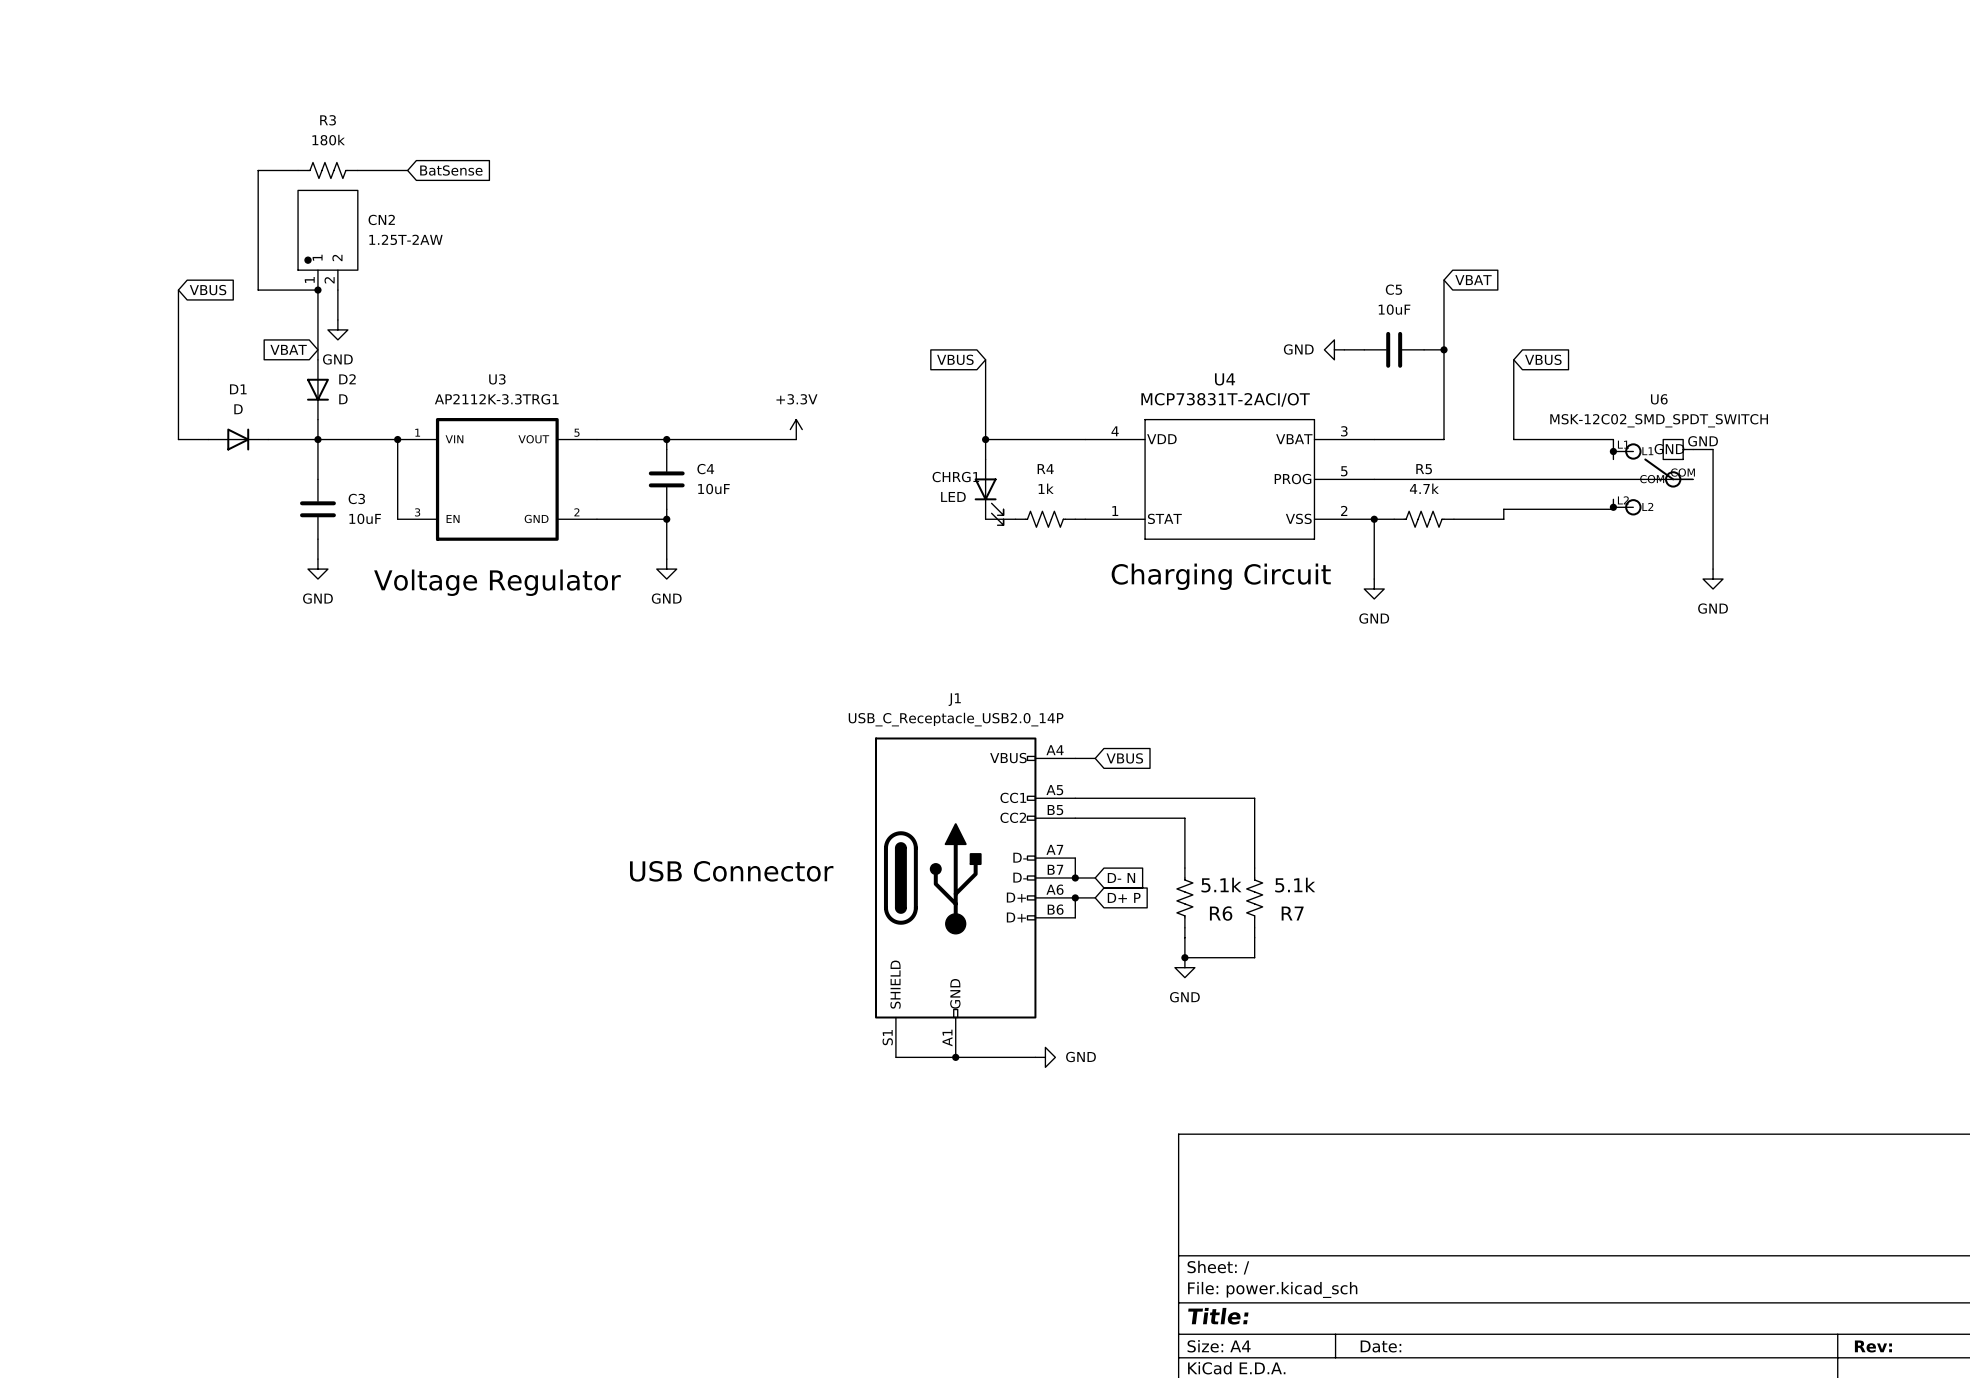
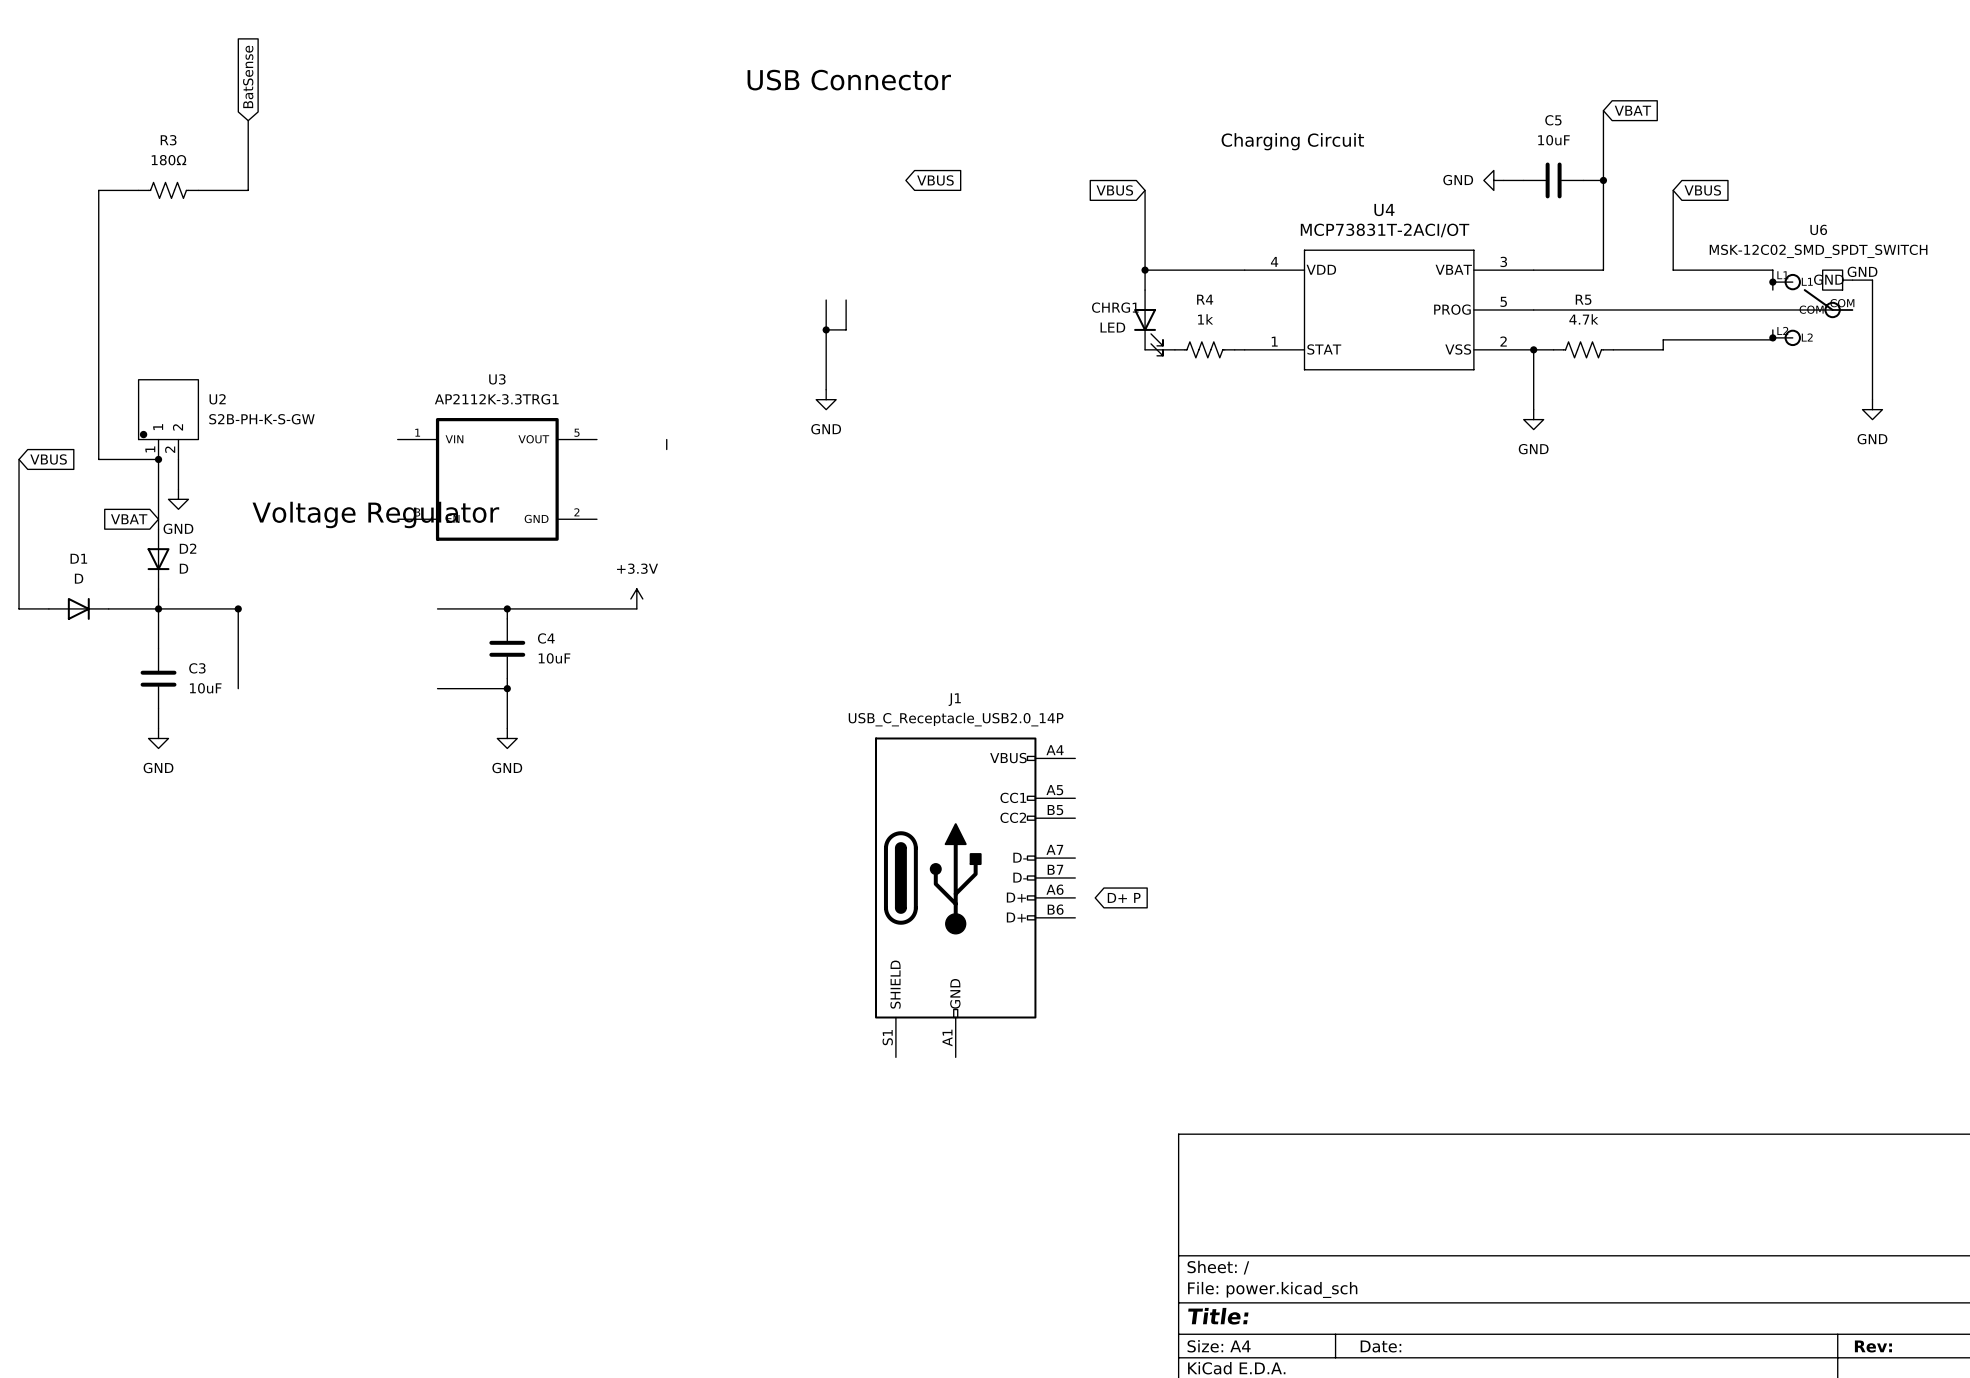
text: none -> USB Connector (849, 80)
wire: none -> (1603, 110) (1603, 270) (1533, 270)
global label: none -> VBAT (1632, 110)
wire: none -> (248, 120) (248, 190) (198, 190)
R3 value: 180k (328, 140) -> 180Ω (168, 160)
text: none -> Charging Circuit (1292, 141)
wire: (298, 170) (258, 170) (258, 290) (317, 290) (317, 359) -> none
R3 position: (327, 170) -> (168, 190)
wire: (357, 170) (407, 170) -> none
global label rotation: 0° (451, 170) -> 90° counterclockwise (248, 76)
global label position: BatSense (451, 170) -> BatSense (248, 76)
global label: none -> VBUS (935, 180)
power symbol: none -> GND (1493, 180)
wire: none -> (1583, 180) (1603, 180)
junction: none -> (1603, 180)
wire: none -> (138, 190) (98, 190) (98, 459) (158, 459) (158, 529)
global label: none -> VBUS (1114, 190)
wire: none -> (1145, 190) (1145, 290)
wire: none -> (1673, 190) (1673, 270) (1772, 270) (1772, 290)
global label: none -> VBUS (1702, 190)
CN2: 1.25T-2AW (327, 239) -> none
wire: none -> (1145, 270) (1244, 270)
junction: none -> (1145, 270)
wire: (1444, 280) (1444, 439) (1374, 439) -> none
global label: VBAT (1473, 280) -> none
wire: none -> (1872, 280) (1872, 399)
junction: none -> (1772, 282)
wire: (178, 290) (178, 439) (208, 439) -> none
global label: VBUS (208, 290) -> none
junction: (317, 290) -> none
wire: (337, 290) (337, 319) -> none
wire: none -> (826, 300) (826, 389)
wire: none -> (846, 300) (846, 329) (826, 329)
wire: none -> (1533, 309) (1852, 309)
power symbol: GND (337, 329) -> none
junction: none -> (826, 329)
wire: none -> (1772, 329) (1772, 339) (1663, 339) (1663, 349) (1613, 349)
junction: none -> (1772, 337)
global label: VBAT (288, 349) -> none
wire: none -> (1145, 349) (1174, 349)
wire: none -> (1234, 349) (1244, 349)
power symbol: GND (1334, 349) -> none
wire: (1344, 349) (1364, 349) -> none
C5 position: (1394, 349) -> (1553, 180)
wire: (1424, 349) (1444, 349) -> (1503, 180) (1523, 180)
junction: (1444, 349) -> none
junction: none -> (1533, 349)
wire: none -> (1553, 349) (1533, 349) (1533, 409)
global label: VBUS (955, 359) -> none
wire: (985, 359) (985, 459) -> none
wire: (1513, 359) (1513, 439) (1613, 439) (1613, 459) -> none
global label: VBUS (1543, 359) -> none
D2 position: (317, 389) -> (158, 559)
power symbol: none -> GND (826, 399)
power symbol: none -> GND (1872, 409)
U2: none -> S2B-PH-K-S-GW (168, 419)
wire: (317, 419) (317, 479) -> none
power symbol: none -> GND (1533, 419)
power symbol: +3.3V (796, 429) -> none
D1 position: (238, 439) -> (78, 608)
wire: (268, 439) (397, 439) (397, 519) -> none
junction: (317, 439) -> none
junction: (397, 439) -> none
wire: (596, 439) (796, 439) -> none
junction: (666, 439) -> none
wire: (985, 439) (1085, 439) -> none
junction: (985, 439) -> none
wire: (1713, 449) (1713, 569) -> none
junction: (1613, 451) -> none
wire: none -> (19, 459) (19, 608) (48, 608)
global label: none -> VBUS (48, 459)
junction: none -> (158, 459)
wire: none -> (178, 459) (178, 489)
U6 position: (1663, 477) -> (1822, 308)
C4 position: (666, 479) -> (507, 648)
U4 position: (1229, 479) -> (1389, 309)
wire: (1374, 479) (1693, 479) -> none
CHRG1 position: (989, 492) -> (1148, 322)
power symbol: none -> GND (178, 499)
wire: (1613, 499) (1613, 509) (1503, 509) (1503, 519) (1453, 519) -> none
junction: (1613, 507) -> none
C3 position: (317, 509) -> (158, 678)
wire: (666, 509) (666, 559) -> none
global label: none -> VBAT (129, 519)
wire: (596, 519) (666, 519) -> none
junction: (666, 519) -> none
wire: (985, 519) (1015, 519) -> none
R4 position: (1045, 519) -> (1204, 349)
wire: (1075, 519) (1085, 519) -> none
junction: (1374, 519) -> none
wire: (1394, 519) (1374, 519) (1374, 579) -> none
R5 position: (1424, 519) -> (1583, 349)
wire: (317, 539) (317, 559) -> none
power symbol: GND (317, 569) -> none
power symbol: GND (666, 569) -> none
text: Charging Circuit (1221, 576) -> none
power symbol: GND (1713, 579) -> none
text position: Voltage Regulator (497, 582) -> Voltage Regulator (375, 514)
wire: none -> (158, 589) (158, 648)
power symbol: GND (1374, 589) -> none
power symbol: none -> +3.3V (636, 598)
wire: none -> (108, 608) (238, 608) (238, 688)
junction: none -> (158, 608)
junction: none -> (238, 608)
wire: none -> (437, 608) (636, 608)
wire: none -> (507, 608) (507, 618)
junction: none -> (507, 608)
wire: none -> (507, 678) (507, 728)
wire: none -> (437, 688) (507, 688)
junction: none -> (507, 688)
wire: none -> (158, 708) (158, 728)
power symbol: none -> GND (158, 738)
power symbol: none -> GND (507, 738)
wire: (1075, 758) (1095, 758) -> none
global label: VBUS (1124, 758) -> none
wire: (1075, 798) (1254, 798) (1254, 868) -> none
wire: (1075, 818) (1184, 818) (1184, 868) -> none
wire: (1075, 858) (1075, 877) (1095, 877) -> none
text: USB Connector (731, 871) -> none
junction: (1075, 877) -> none
global label: D- N (1121, 877) -> none
junction: (1075, 897) -> none
wire: (1095, 897) (1075, 897) (1075, 917) -> none
R6: 5.1k (1184, 897) -> none
R7: 5.1k (1254, 897) -> none
wire: (1184, 927) (1184, 957) (1254, 957) (1254, 927) -> none
junction: (1184, 957) -> none
power symbol: GND (1184, 967) -> none
wire: (895, 1057) (1035, 1057) -> none
junction: (955, 1057) -> none
power symbol: GND (1045, 1057) -> none

